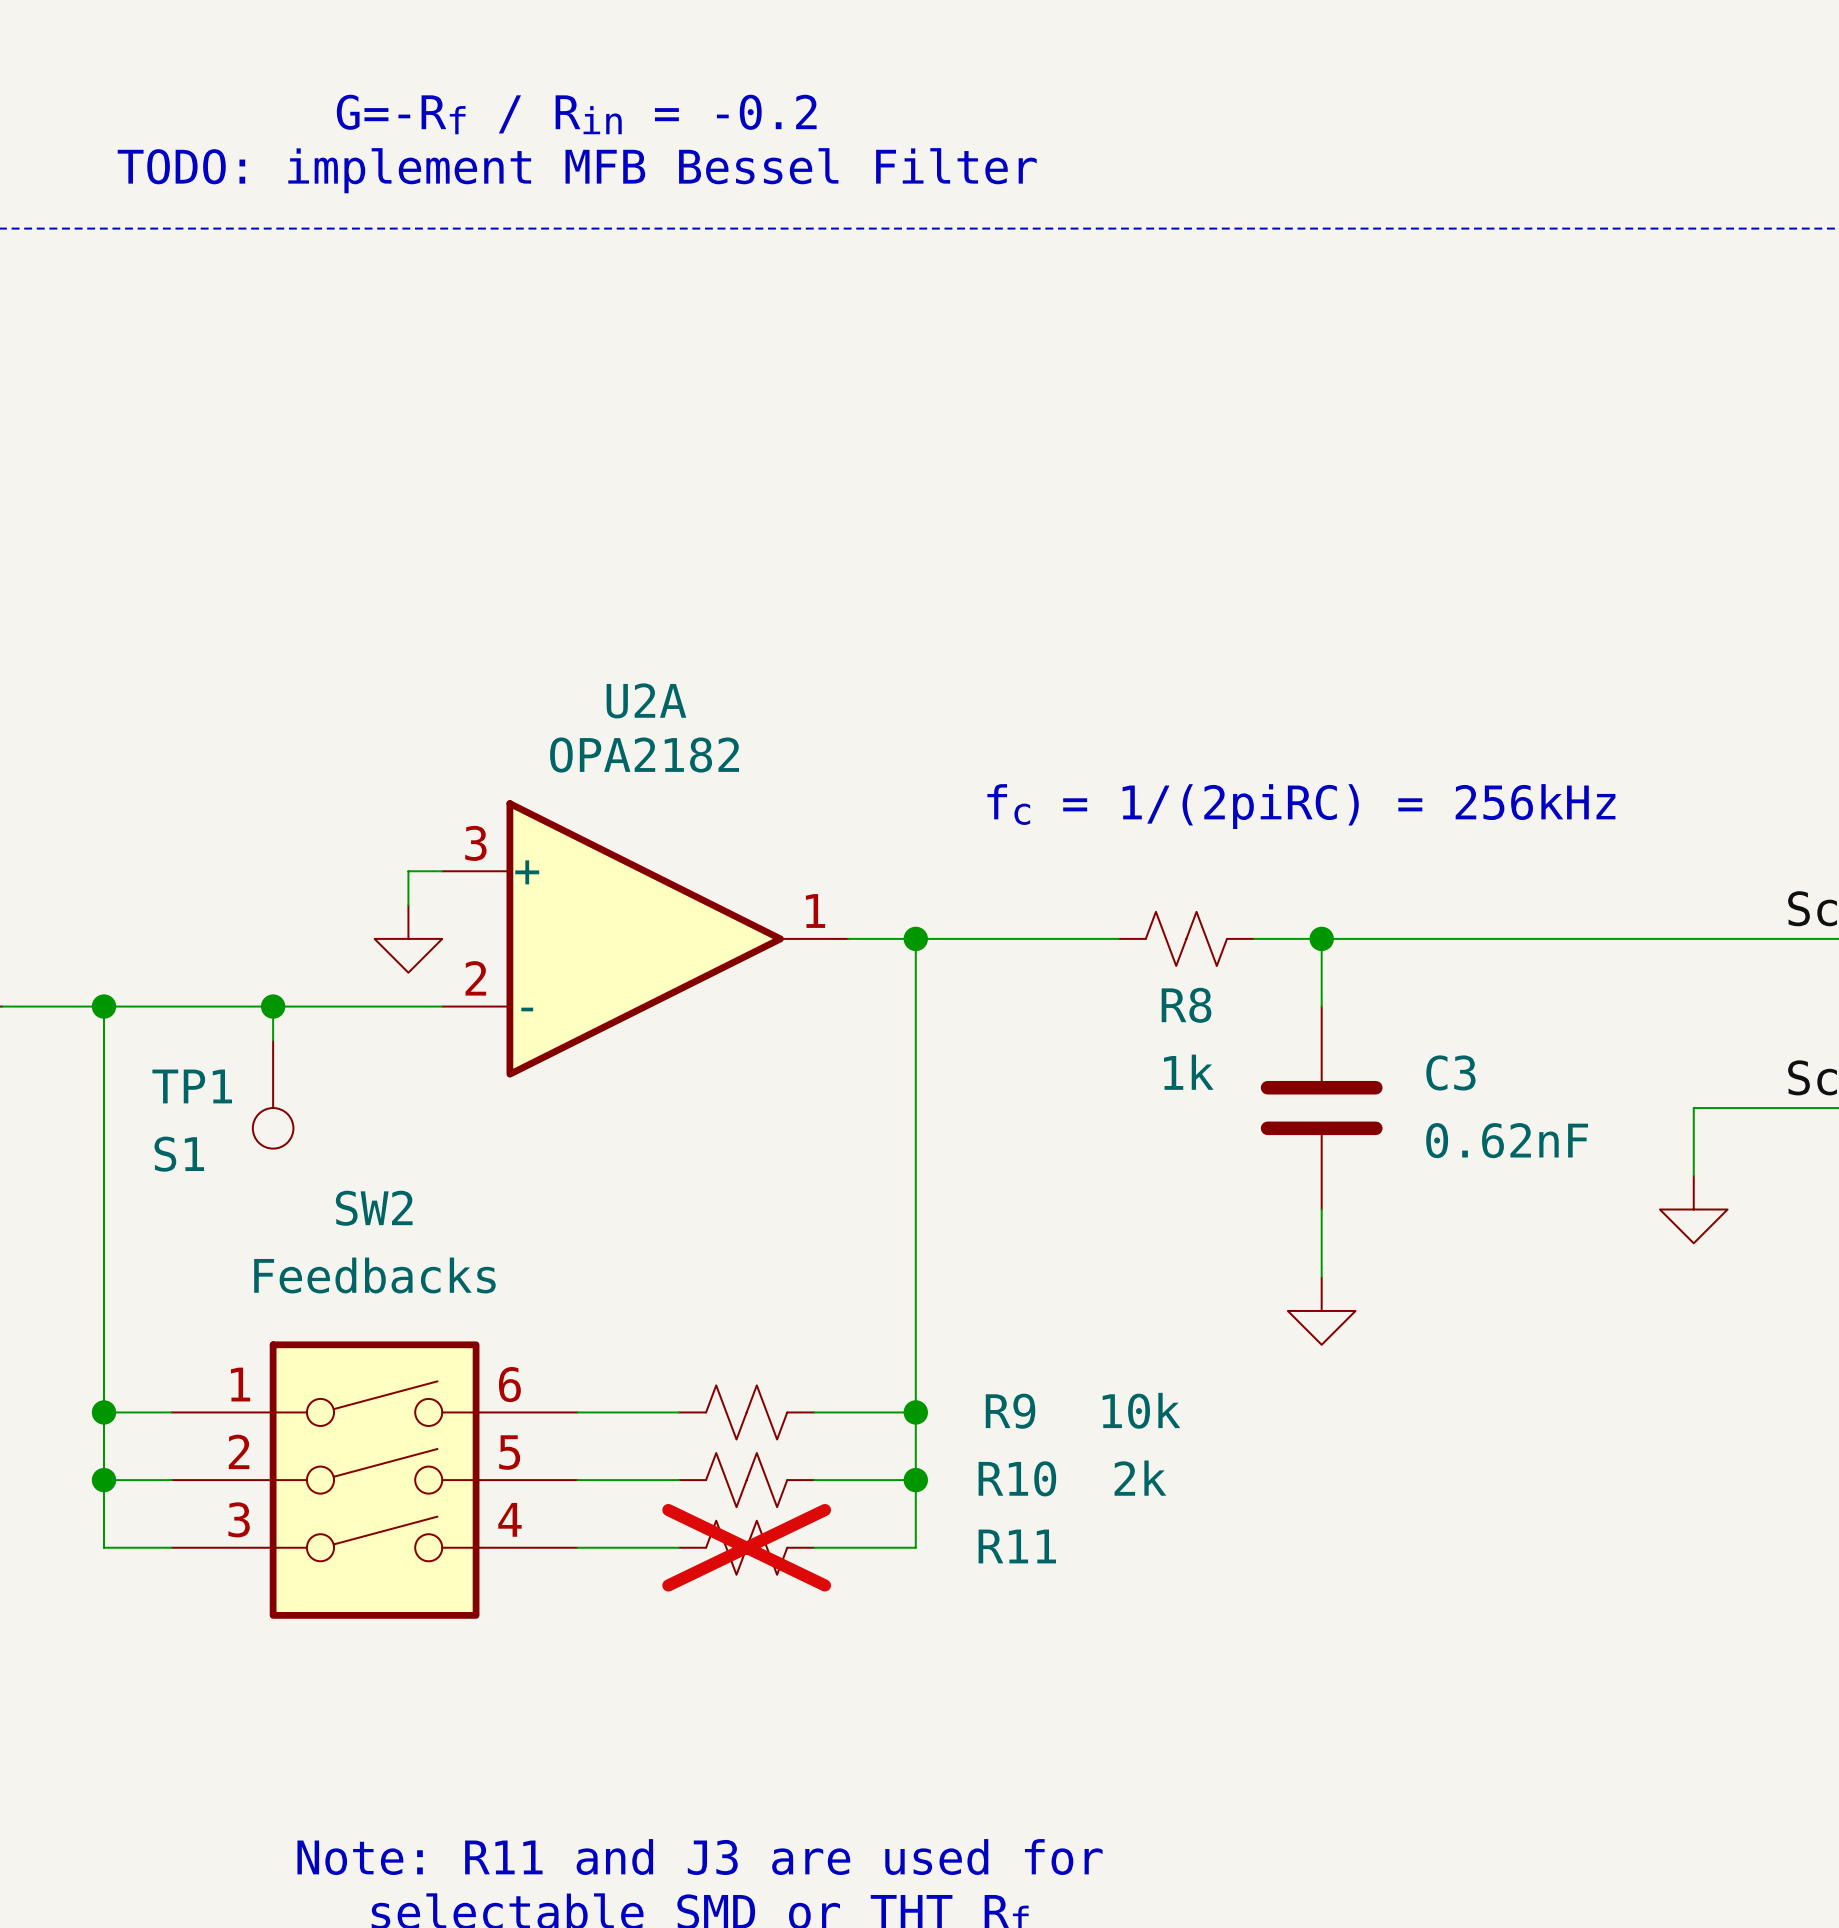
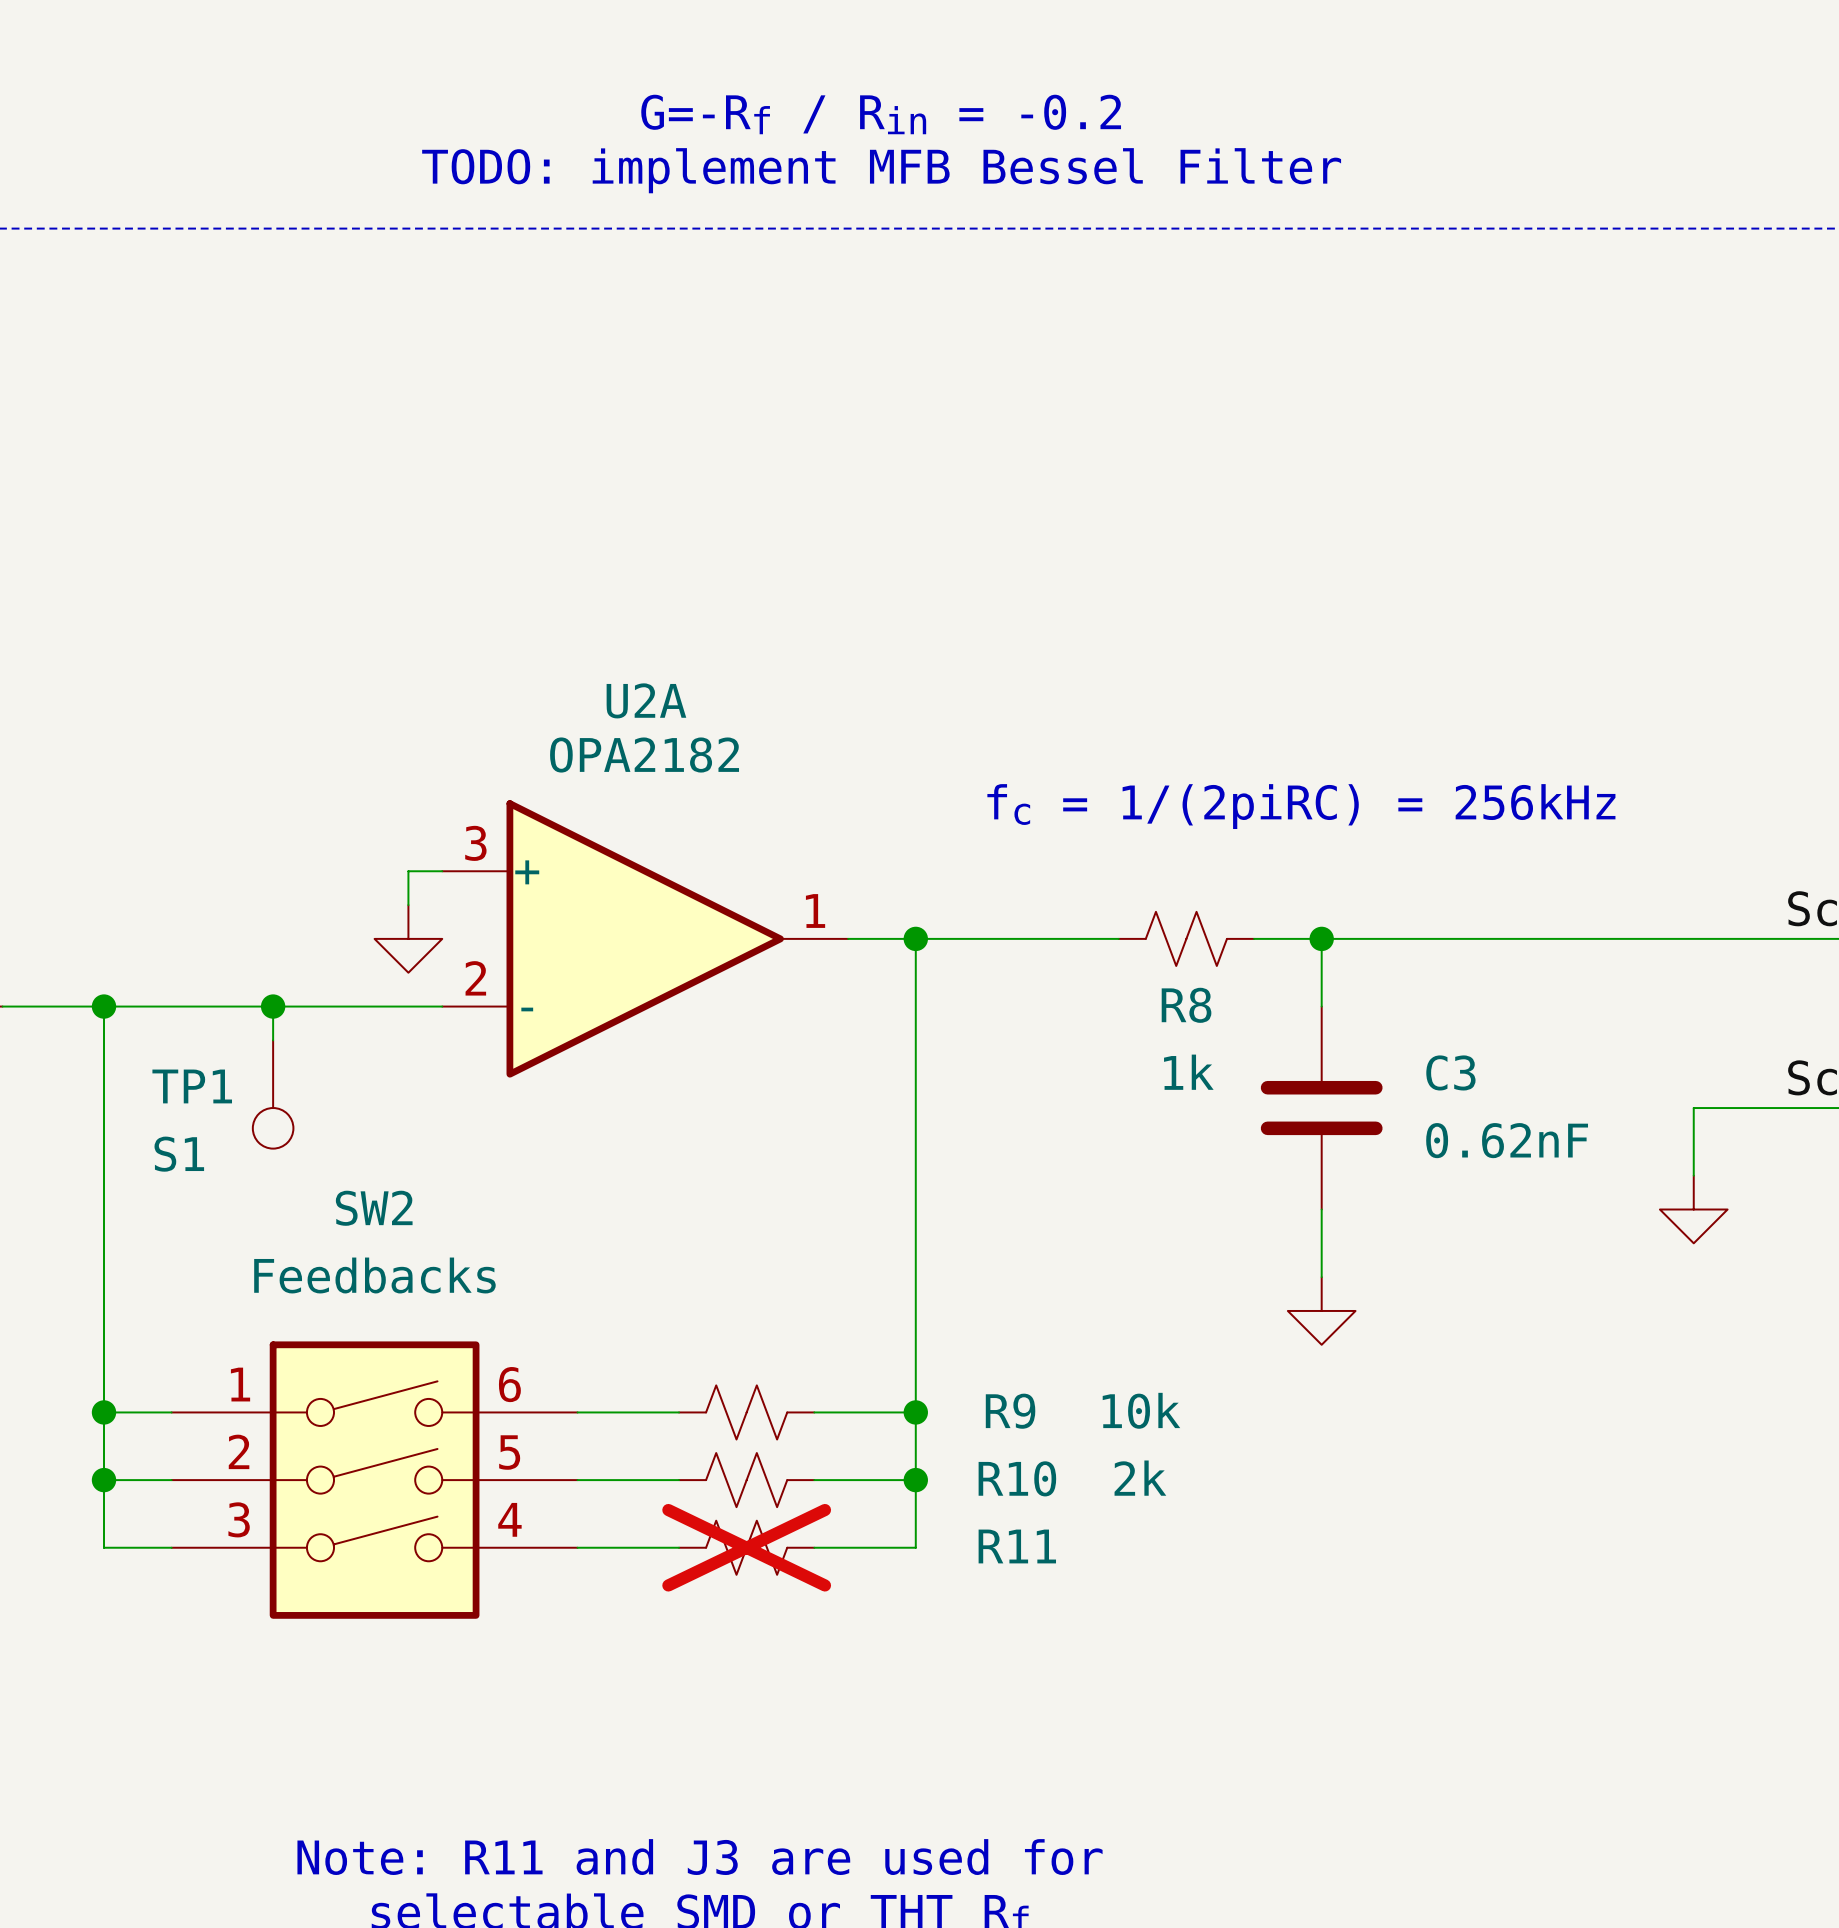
text position: G=-Rf / Rin = -0.2 (576, 114) -> G=-Rf / Rin = -0.2 (881, 114)
text position: TODO: implement MFB Bessel Filter (577, 170) -> TODO: implement MFB Bessel Filter (881, 170)

